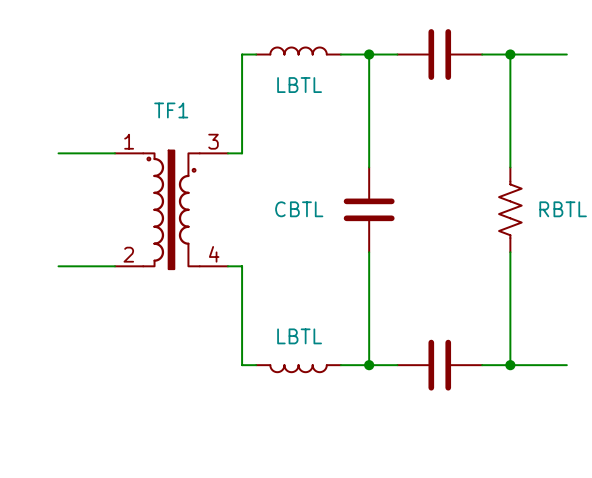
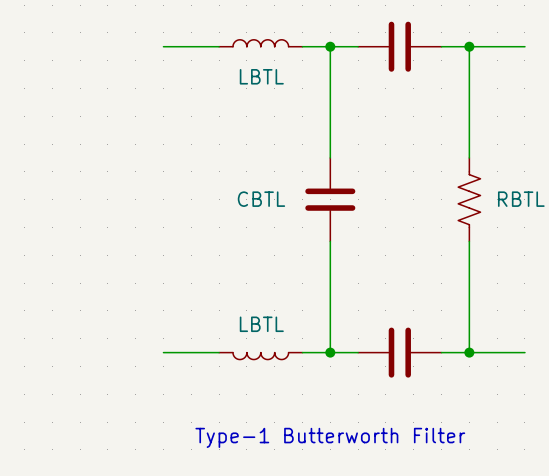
wire: (242, 54) (242, 153) (227, 153) -> (205, 46) (163, 46)
wire: (58, 153) (115, 153) -> none
TF1: (171, 209) -> none
wire: (58, 266) (115, 266) -> none
wire: (227, 266) (242, 266) (242, 365) -> (163, 352) (205, 352)
text: none -> Type-1 Butterworth Filter (330, 437)

